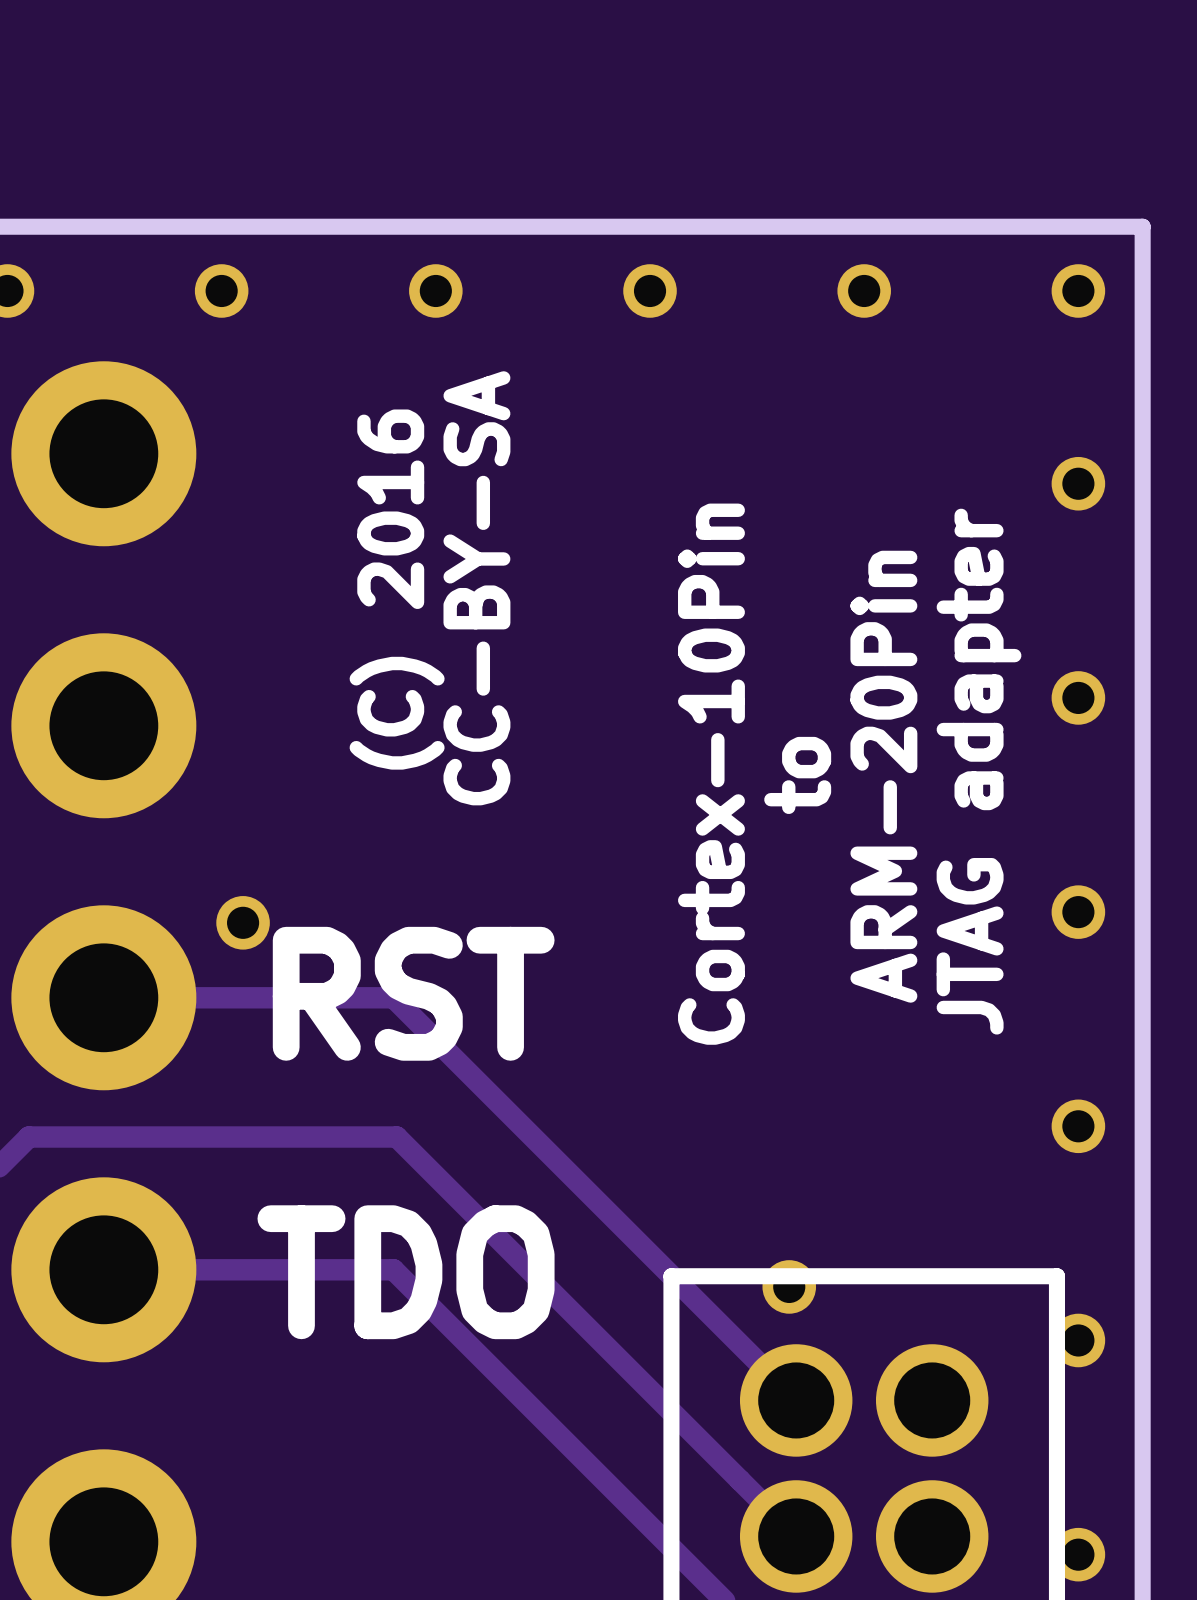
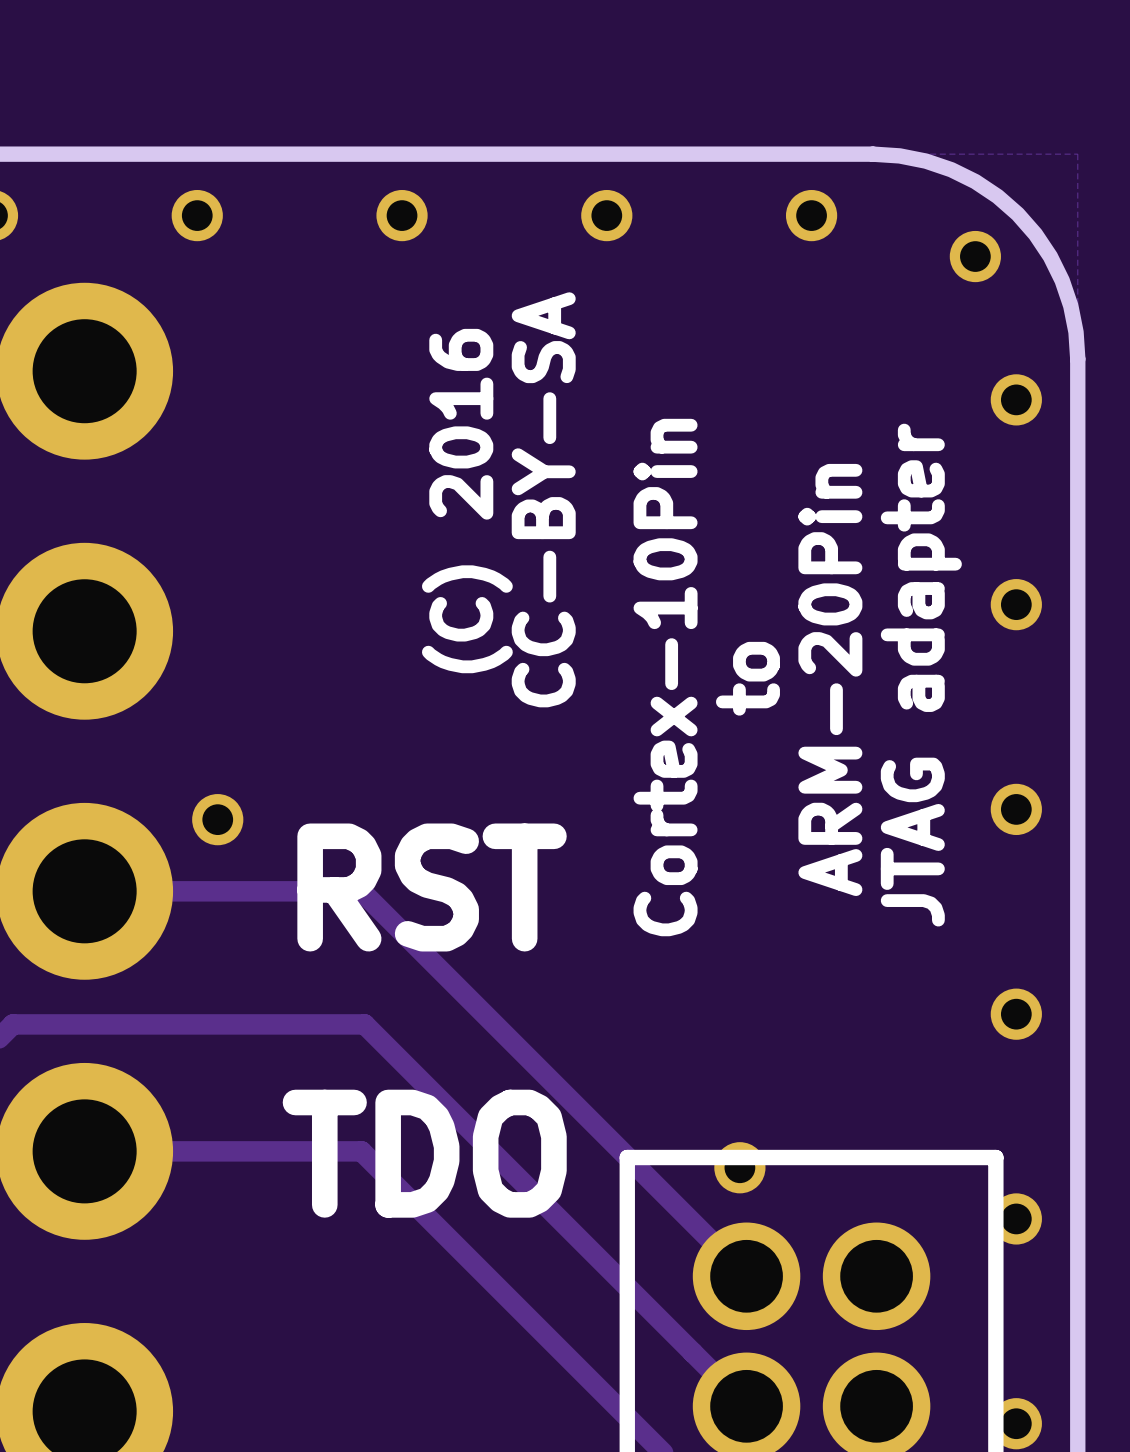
board edge: (928, 226) (1142, 226) (1142, 440) -> (873, 154) (899, 155) (926, 161) (951, 169) (975, 181) (997, 196) (1017, 214) (1035, 234) (1050, 256) (1062, 280) (1070, 305) (1076, 332) (1077, 358)
part position: (1078, 290) -> (975, 256)
text position: CC-BY-SA (476, 588) -> CC-BY-SA (543, 499)
text position: (C) 2016 (397, 589) -> (C) 2016 (467, 501)
text position: RST (413, 993) -> RST (432, 887)
text position: TDO (406, 1272) -> TDO (424, 1153)

